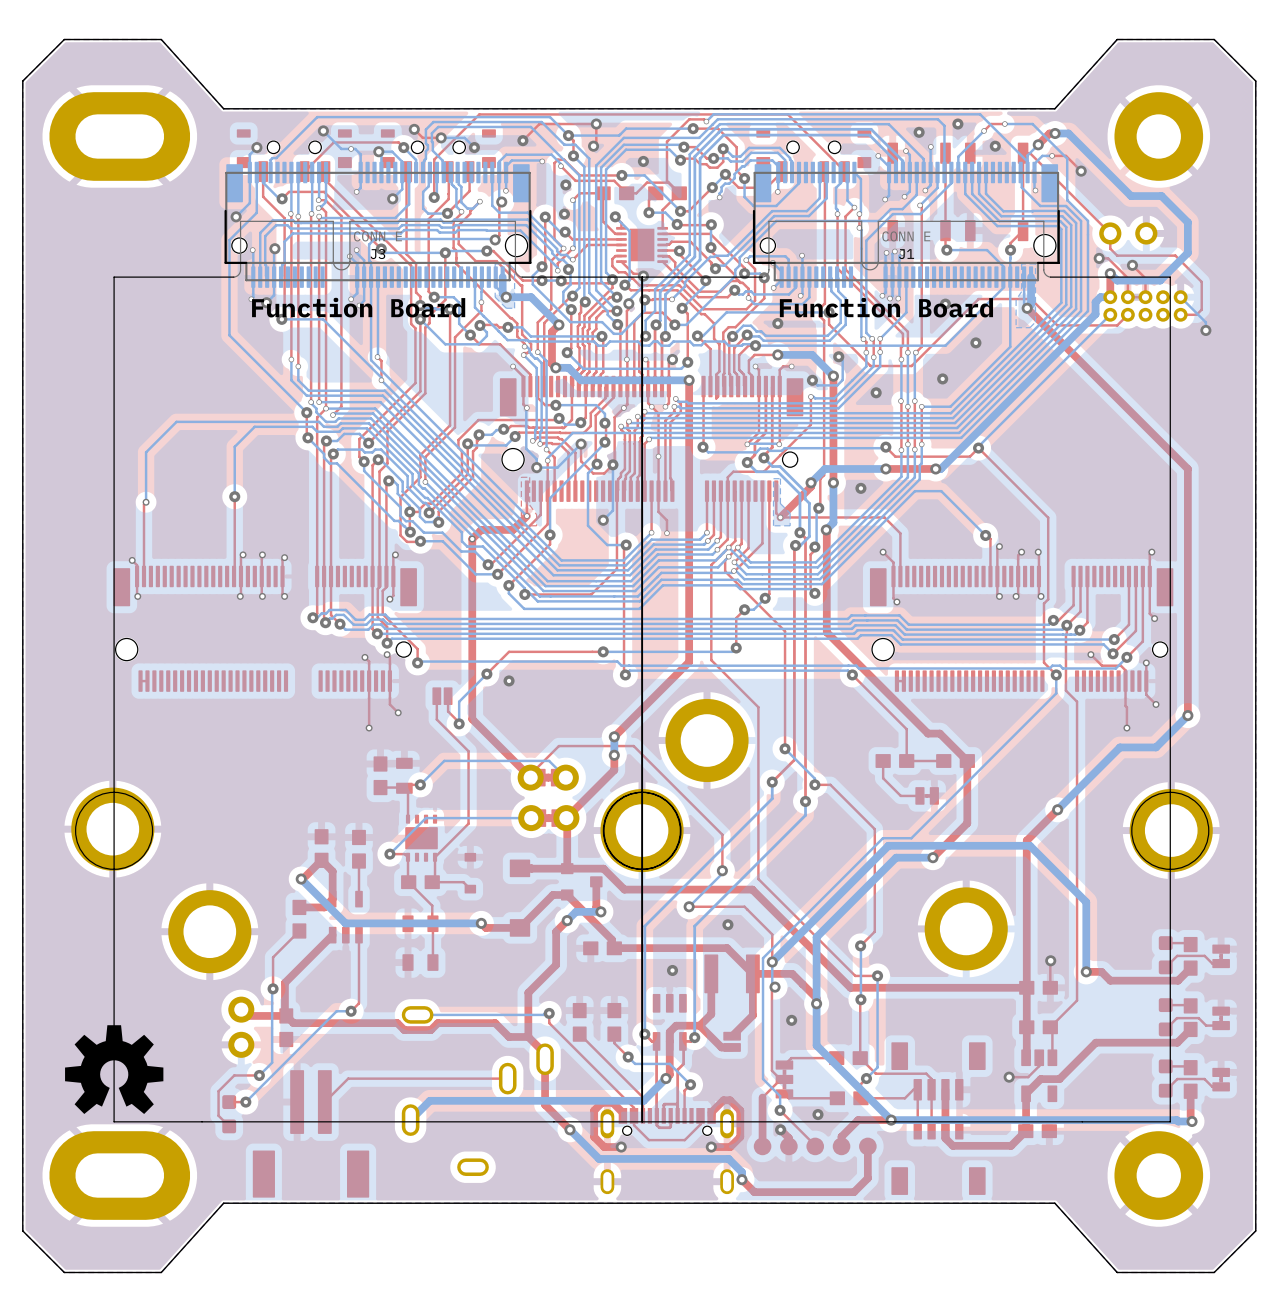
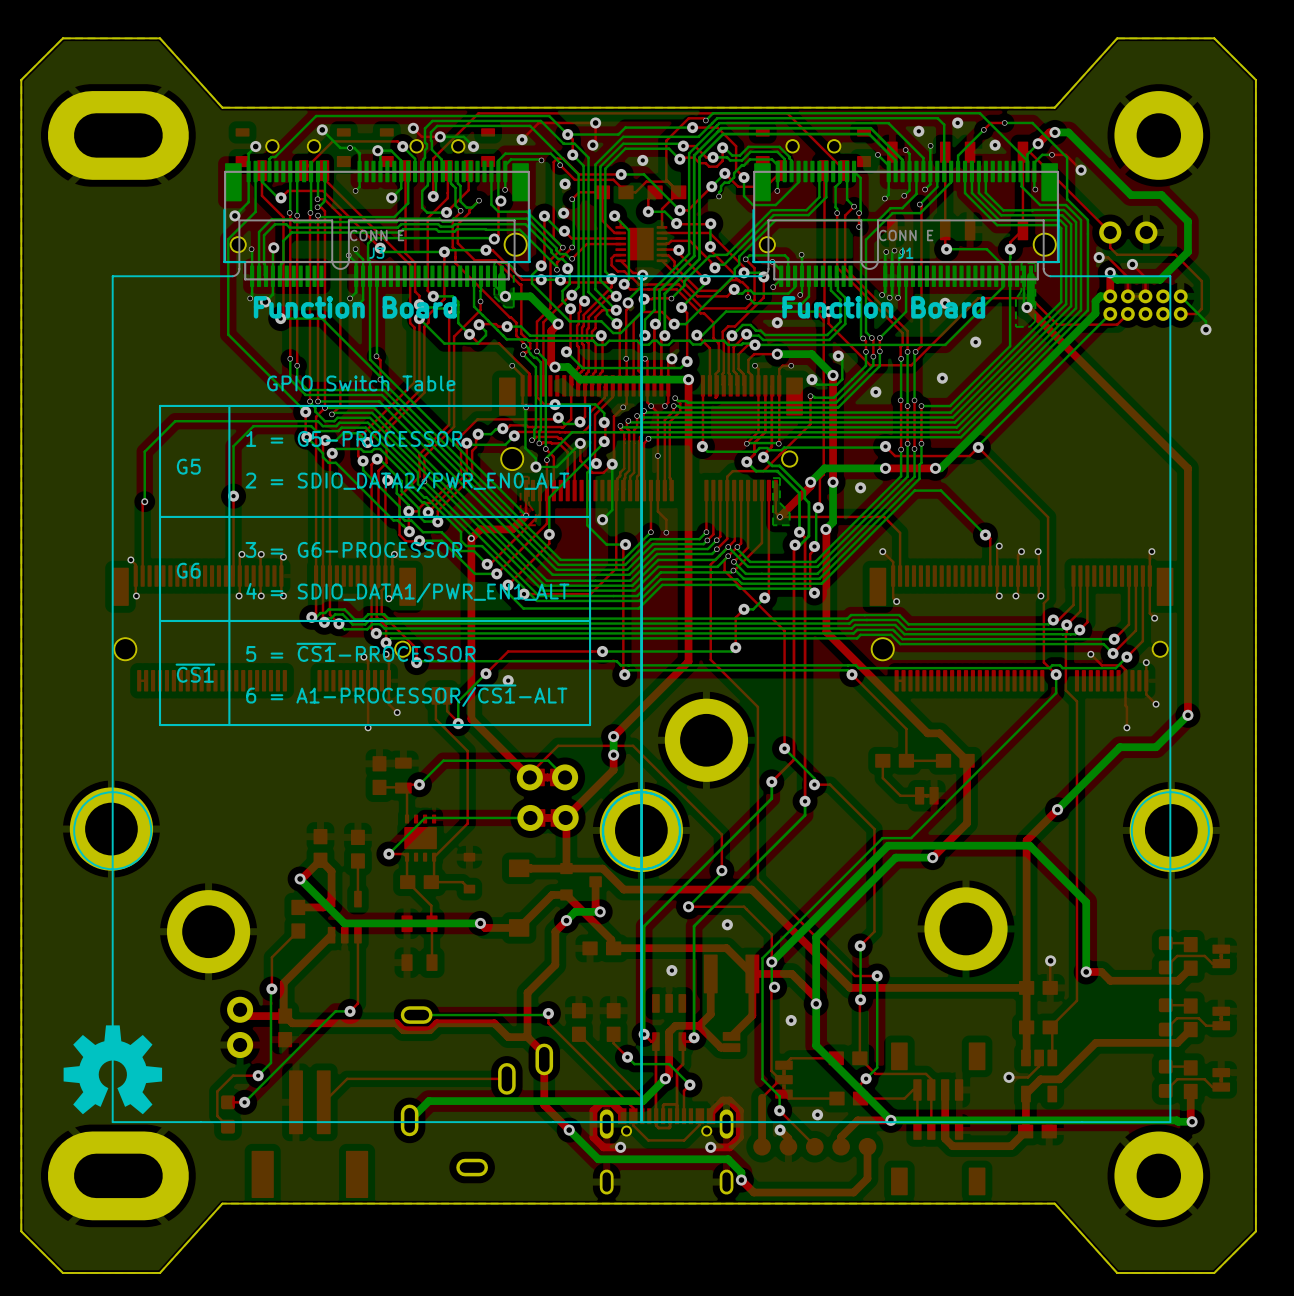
text: none -> GPIO Switch Table (361, 383)
line: none -> (229, 405) (229, 725)
line: none -> (590, 405) (160, 405) (160, 725) (590, 725) (590, 405)
text: none -> 1 = G5-PROCESSOR (354, 438)
text: none -> G5 (188, 466)
text: none -> 2 = SDIO_DATA2/PWR_EN0_ALT (407, 481)
line: none -> (590, 516) (160, 516)
text: none -> 3 = G6-PROCESSOR (353, 549)
text: none -> G6 (188, 570)
text: none -> 4 = SDIO_DATA1/PWR_EN1_ALT (407, 592)
line: none -> (590, 620) (160, 620)
text: none -> 5 = ~{CS1}-PROCESSOR (360, 652)
text: none -> ~{CS1} (195, 673)
text: none -> 6 = A1-PROCESSOR/~{CS1}-ALT (406, 695)

